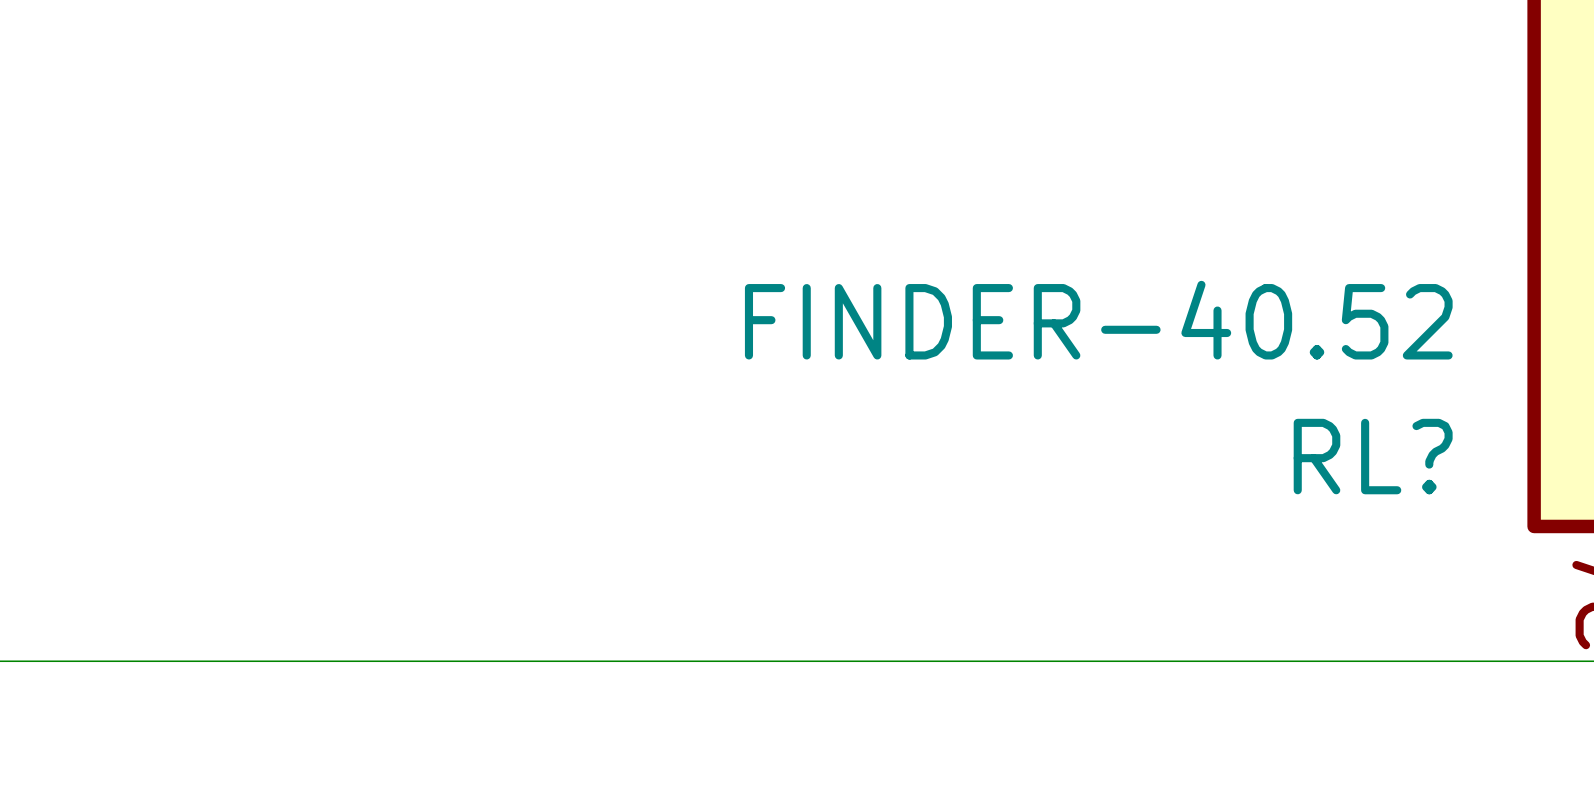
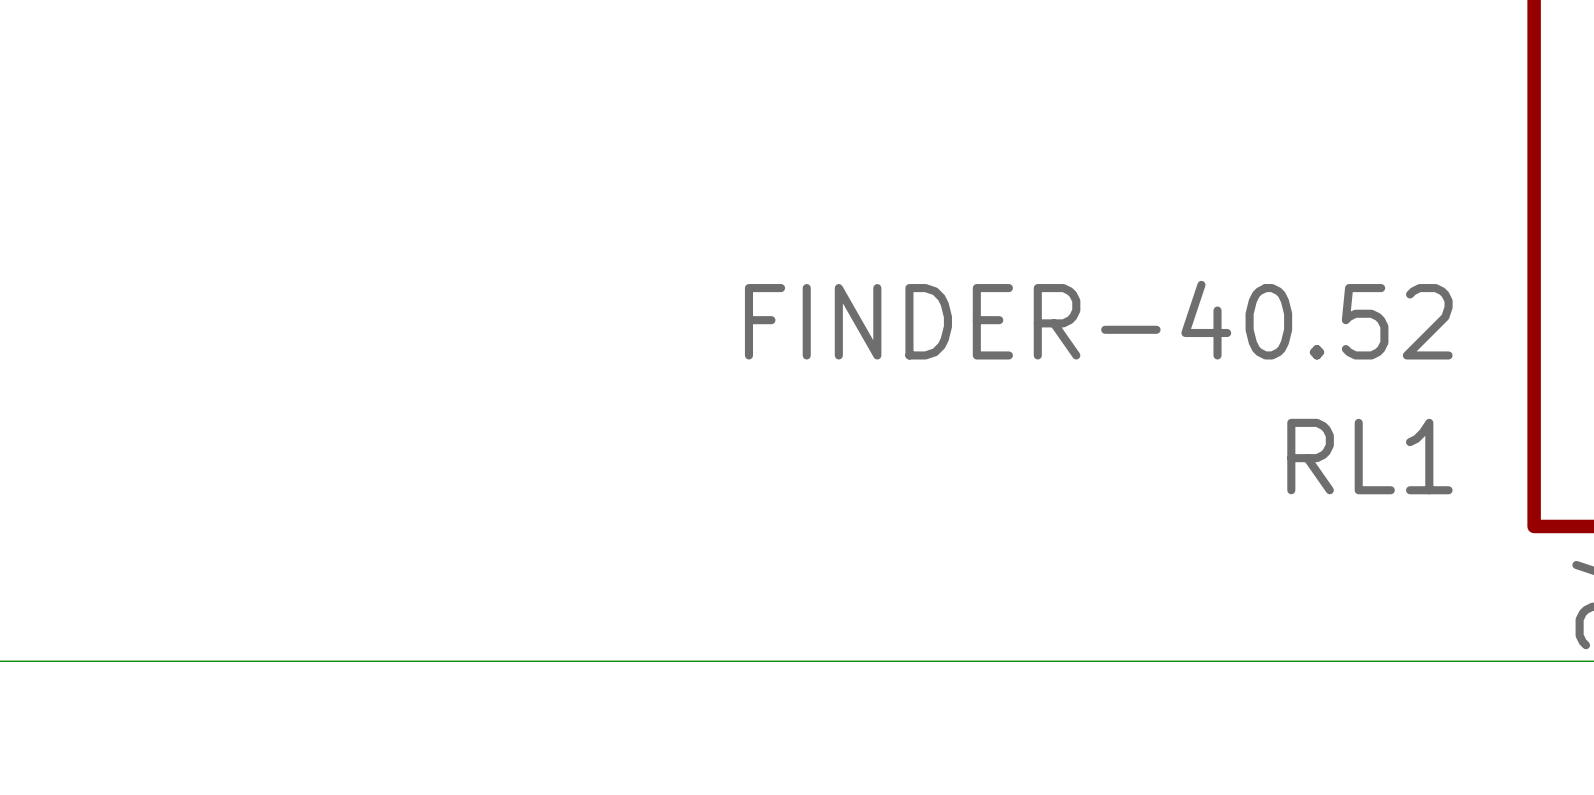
RL? name: RL? (1373, 456) -> RL1 (1369, 456)

